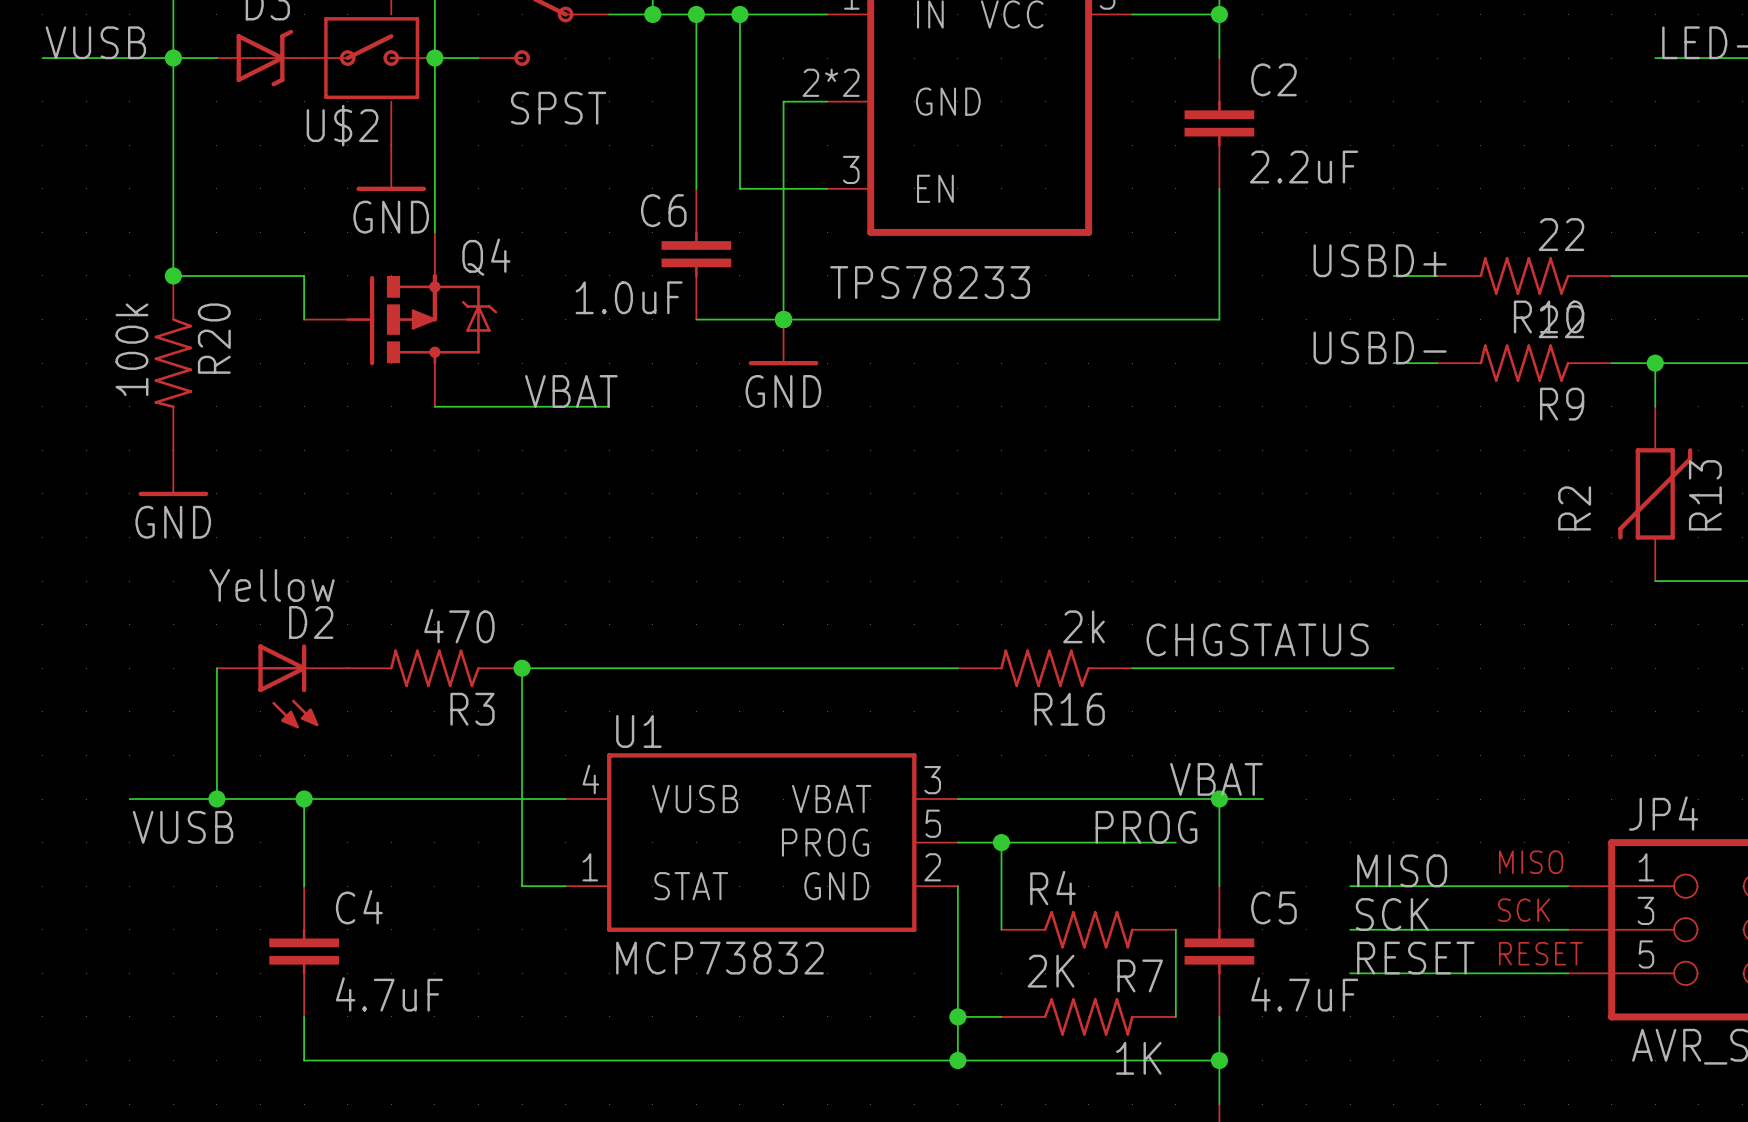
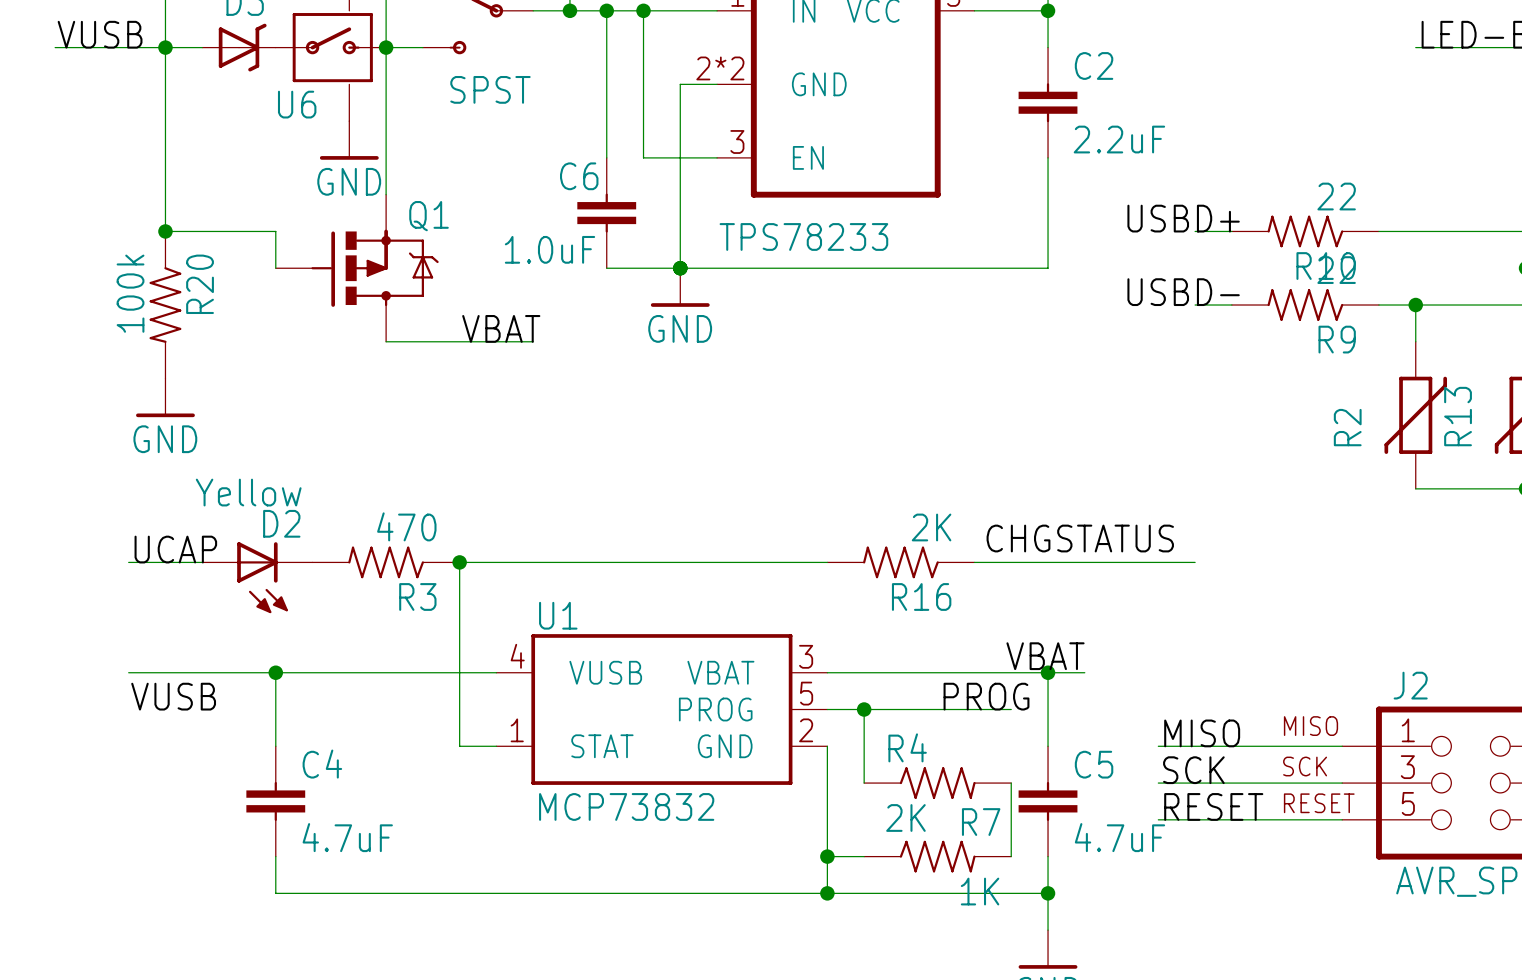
U$2 name: U$2 (342, 125) -> U6 (297, 104)
Q4 name: Q4 (486, 257) -> Q1 (429, 216)
R16 value: 2k (1083, 626) -> 2K (931, 527)
label: none -> UCAP (175, 549)
wire: (216, 668) (216, 799) -> (202, 562) (128, 562)
junction: (216, 799) -> none
JP4 name: JP4 (1663, 813) -> J2 (1410, 685)

